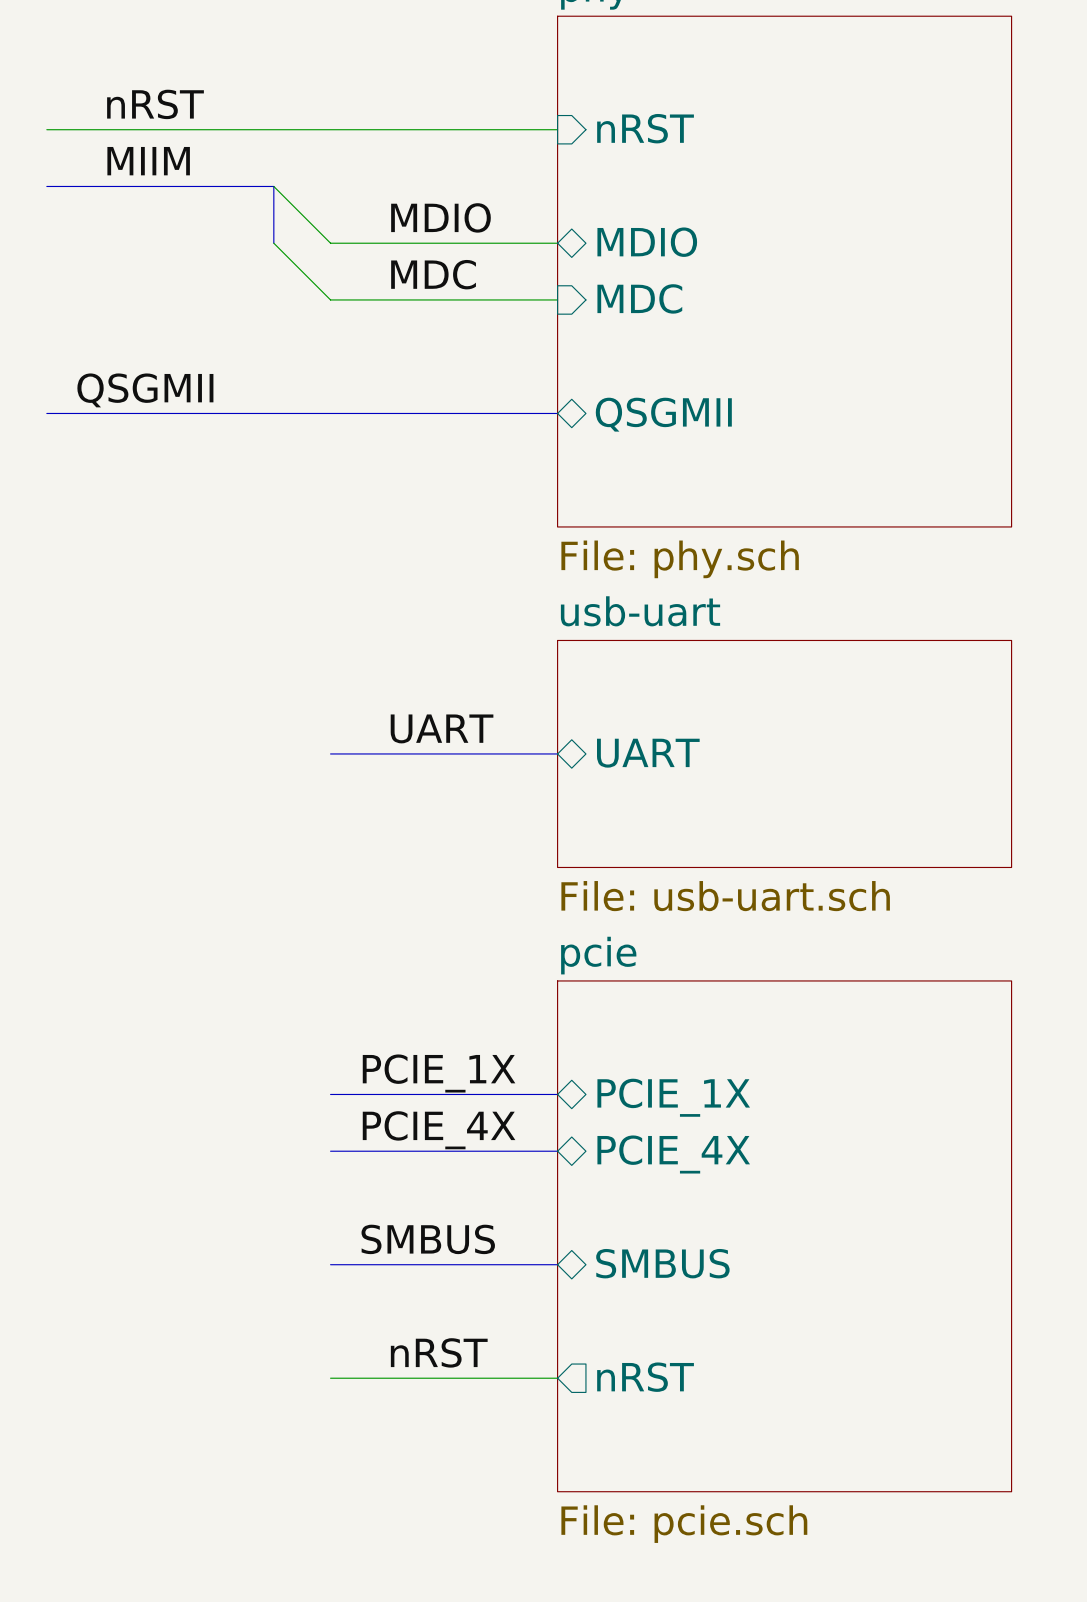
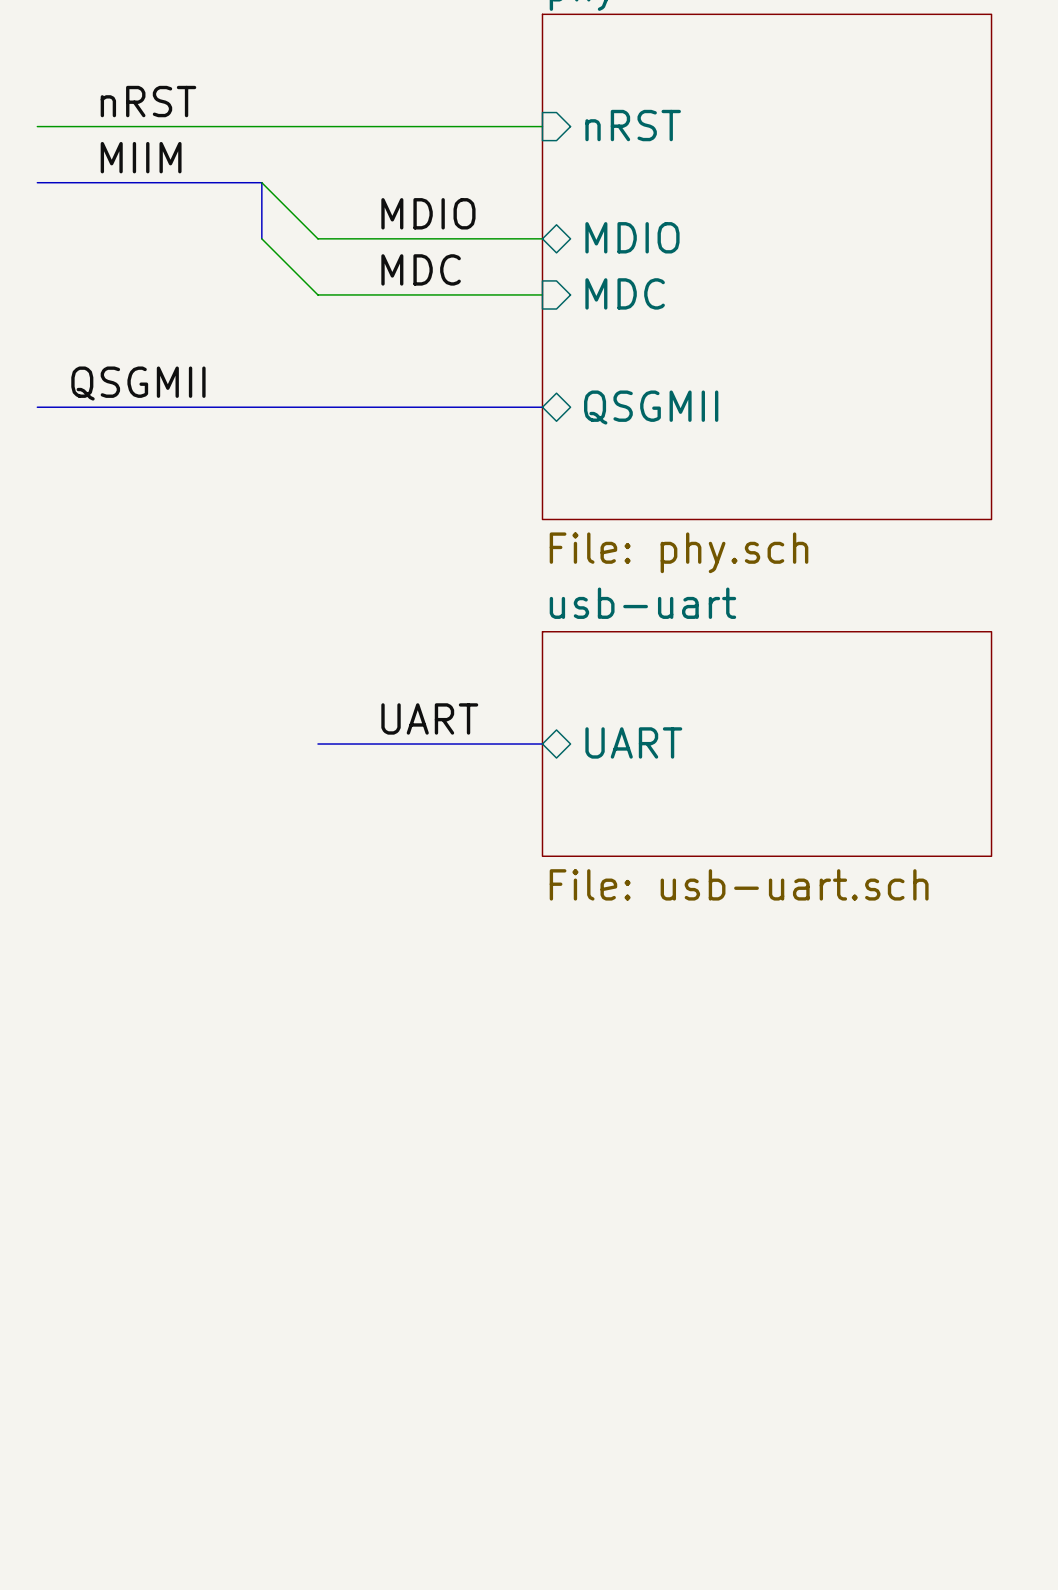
label: PCIE_1X (439, 1073) -> none
bus: (330, 1094) (557, 1094) -> none
sheet pin: PCIE_1X (673, 1097) -> none
label: PCIE_4X (439, 1130) -> none
bus: (330, 1151) (557, 1151) -> none
sheet pin: PCIE_4X (673, 1154) -> none
sheet pcie: File: pcie.sch (784, 1236) -> none
label: SMBUS (428, 1239) -> none
sheet pin: SMBUS (662, 1263) -> none
bus: (330, 1264) (557, 1264) -> none
label: nRST (439, 1352) -> none
sheet pin: nRST (645, 1377) -> none
wire: (330, 1378) (557, 1378) -> none

